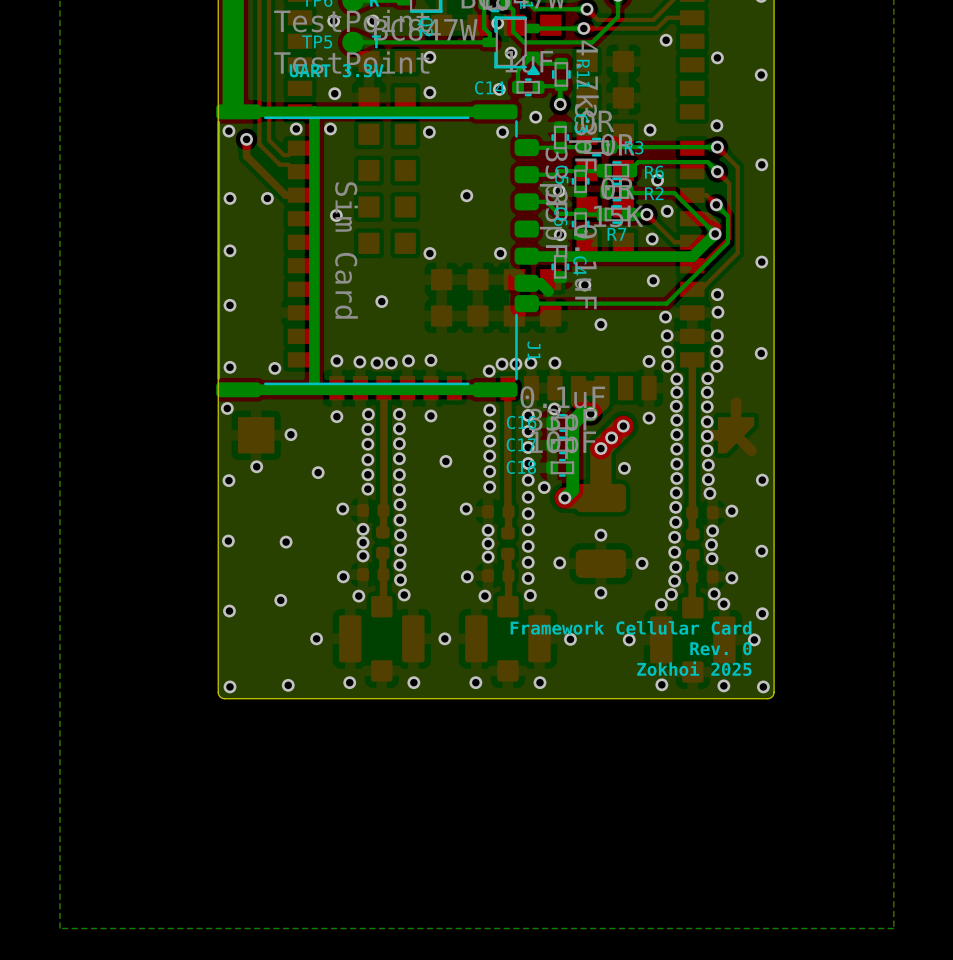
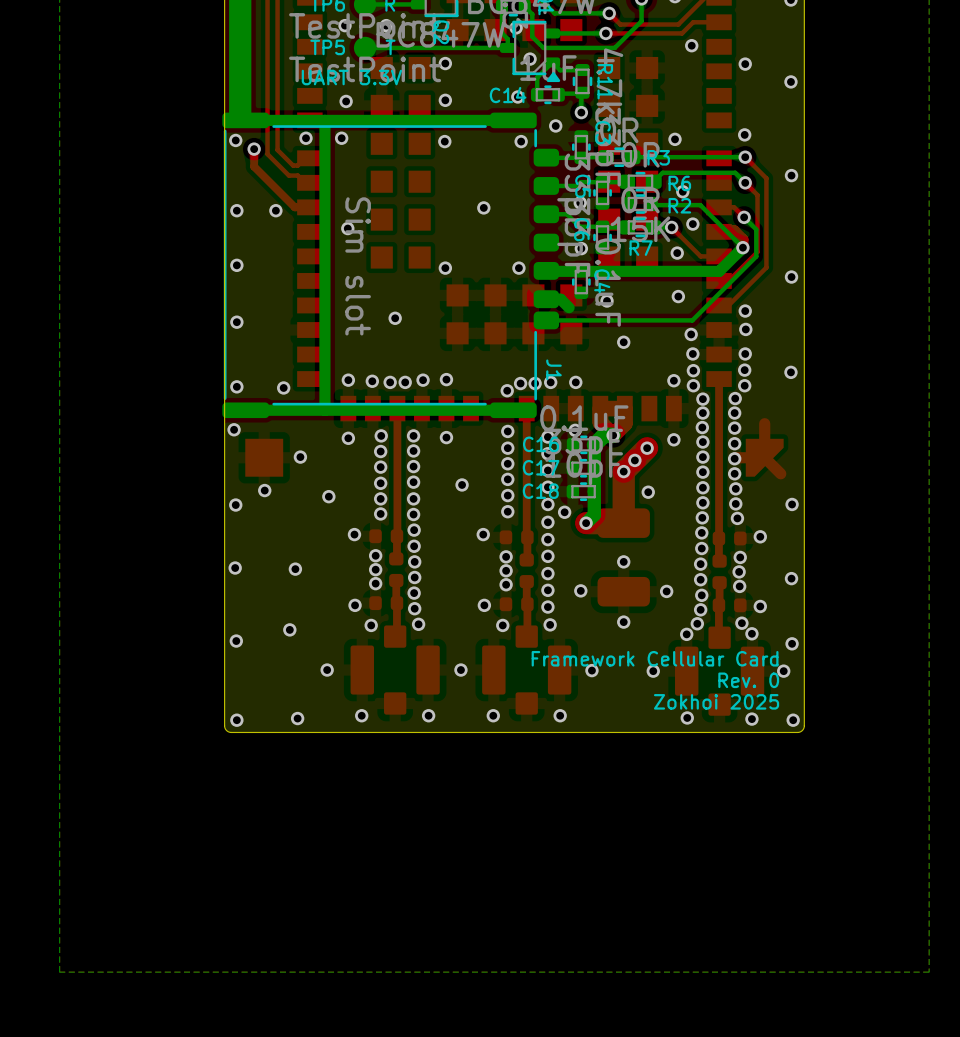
J1 value: Sim Card (346, 250) -> Sim slot (358, 266)

